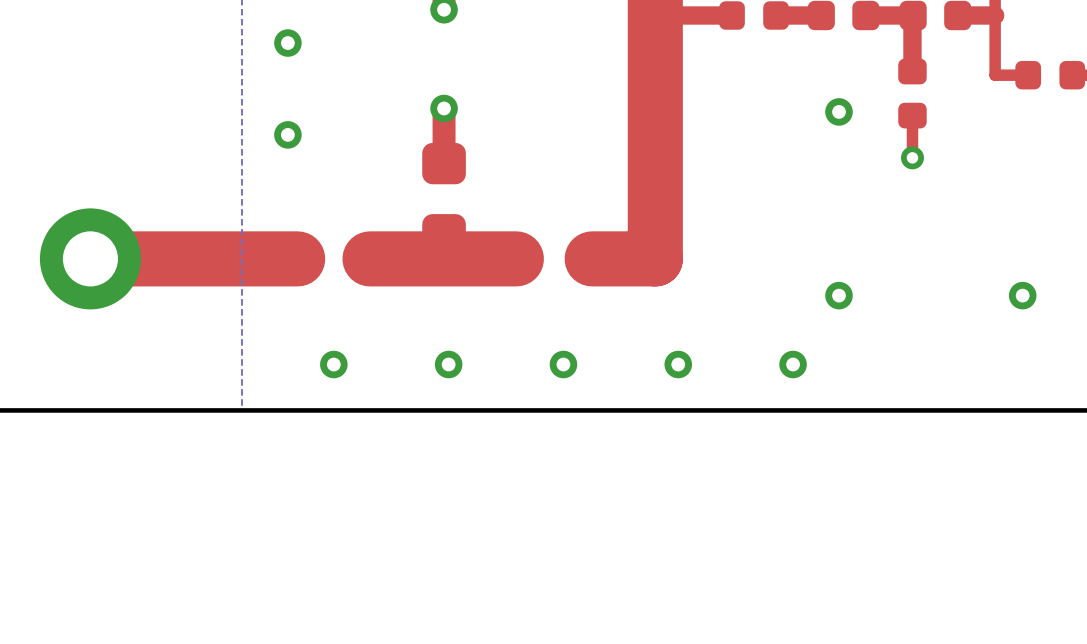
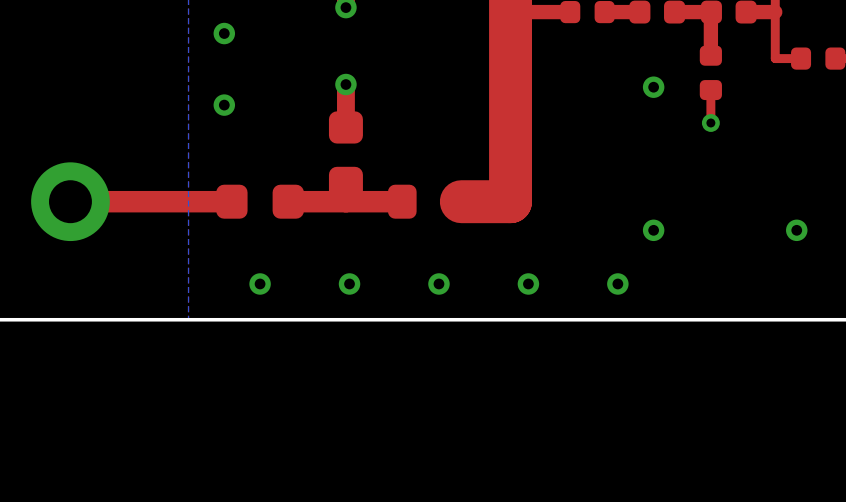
top track width: thick (297, 258) (90, 258) -> thin (231, 201) (70, 201)
top track width: thick (516, 258) (370, 258) -> thin (402, 201) (288, 201)

